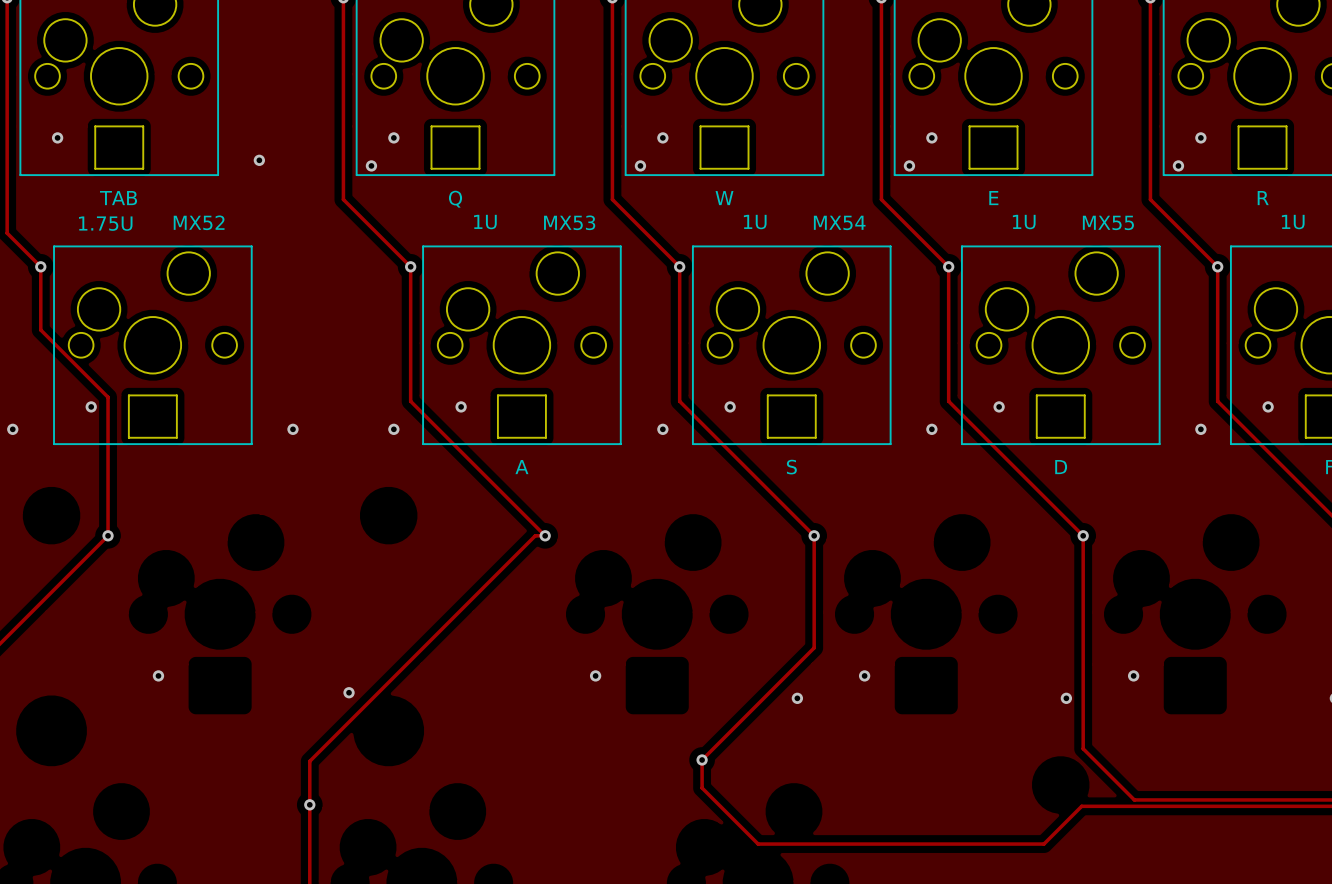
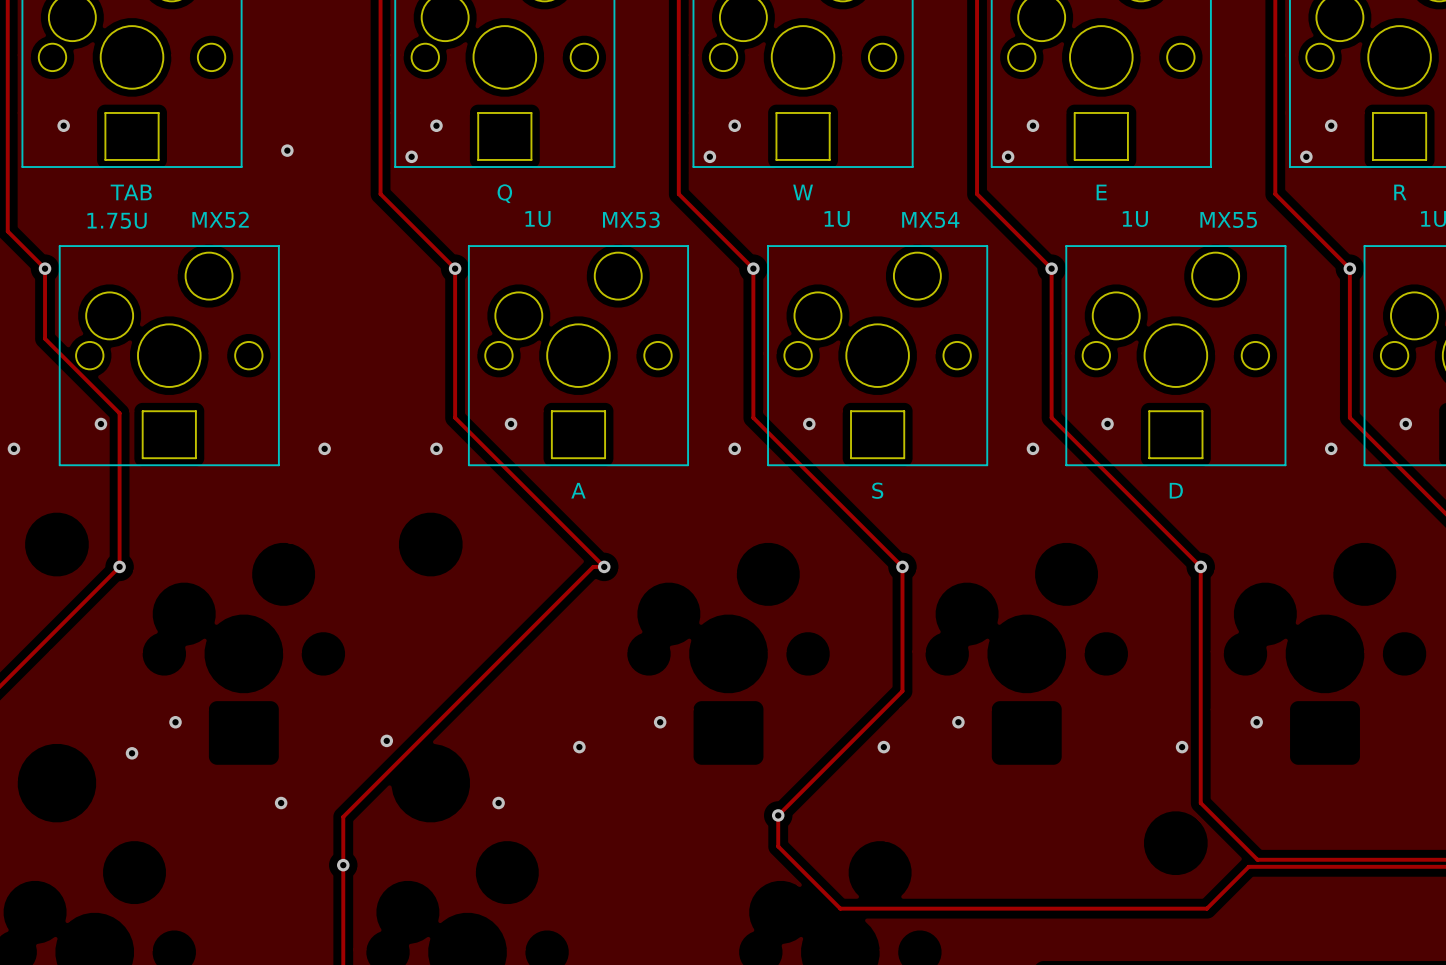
via: none -> (579, 747)
via: none -> (132, 753)
via: none -> (281, 803)
via: none -> (498, 803)
track: (1126, 806) (1081, 806) (1043, 844) -> (1248, 866) (1206, 908) (1157, 908)

